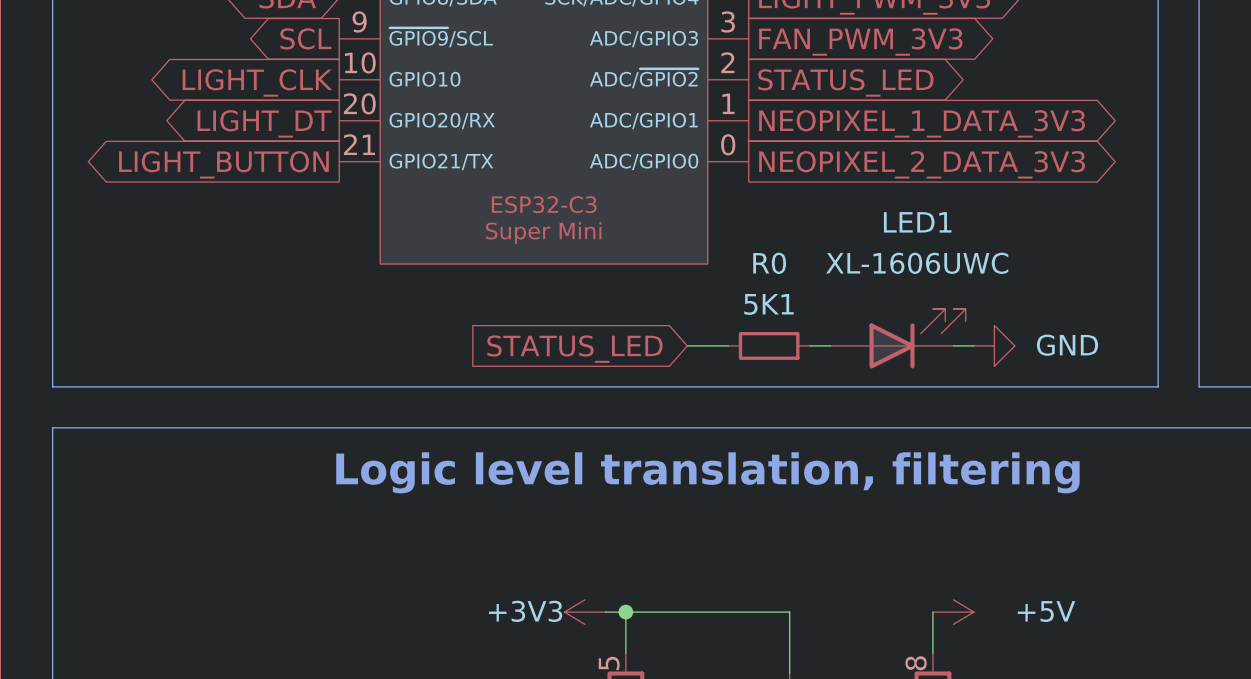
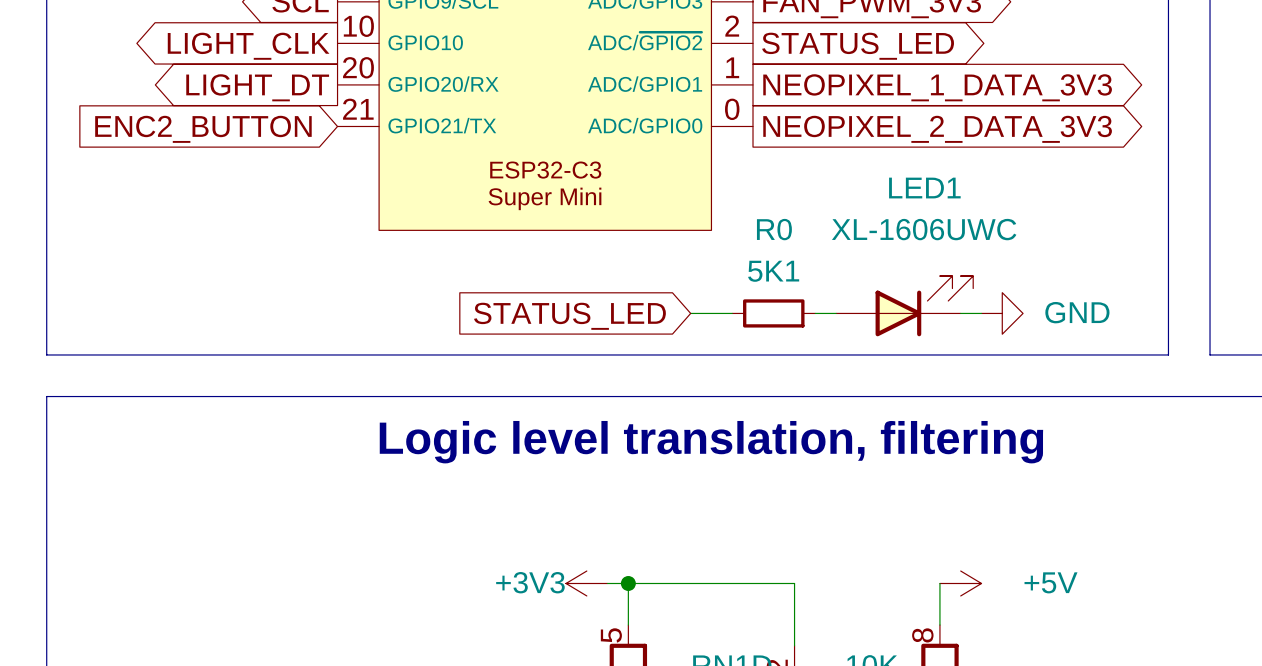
global label shape: output (223, 164) -> input (203, 129)
global label: LIGHT_BUTTON (223, 164) -> ENC2_BUTTON (203, 129)

